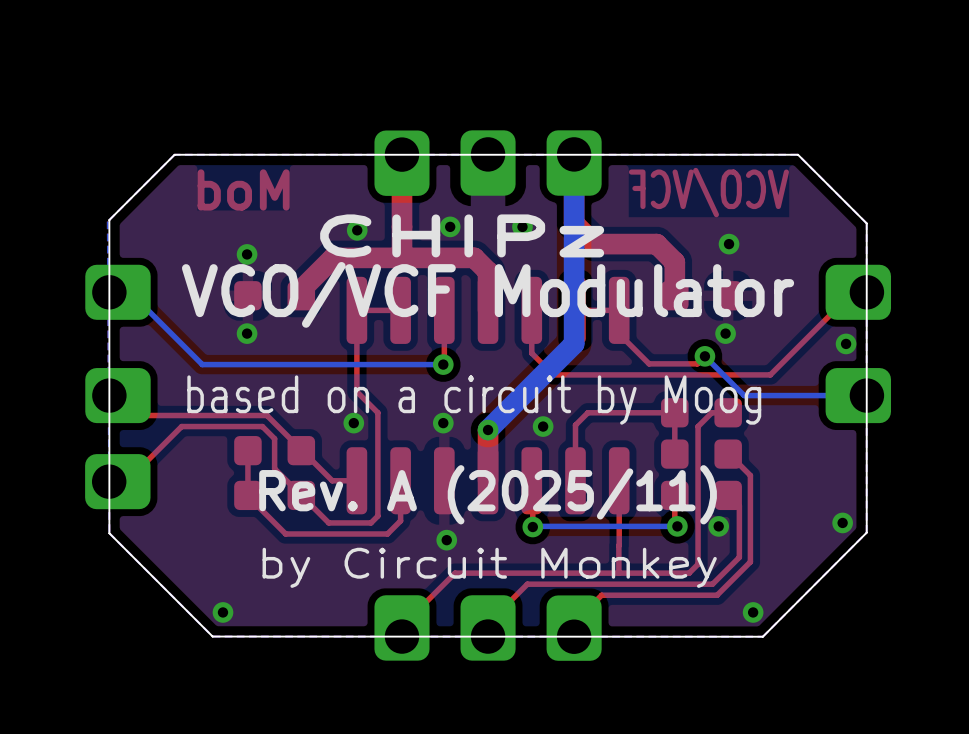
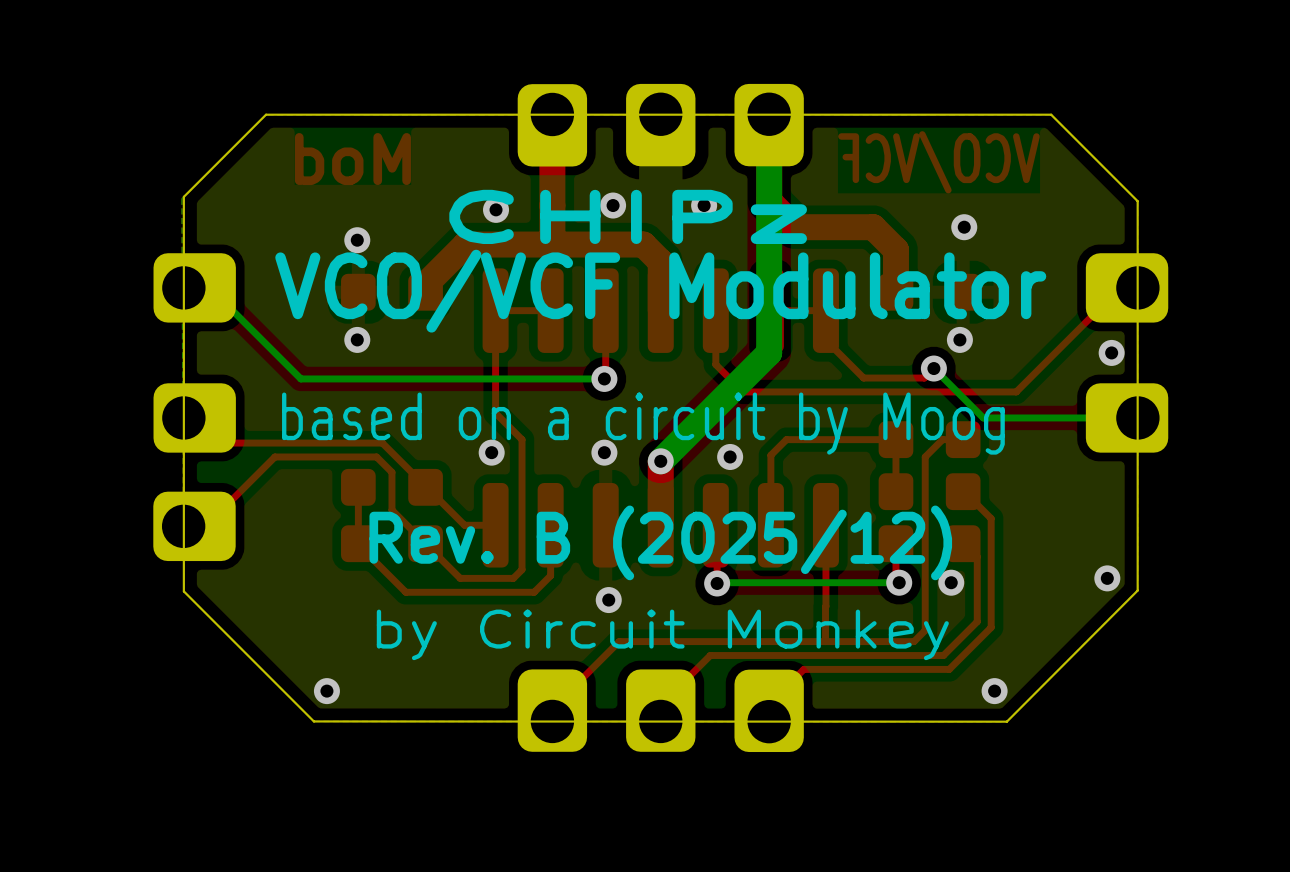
text: Rev. A (2025/11) (488, 494) -> Rev. B (2025/12) (660, 542)

